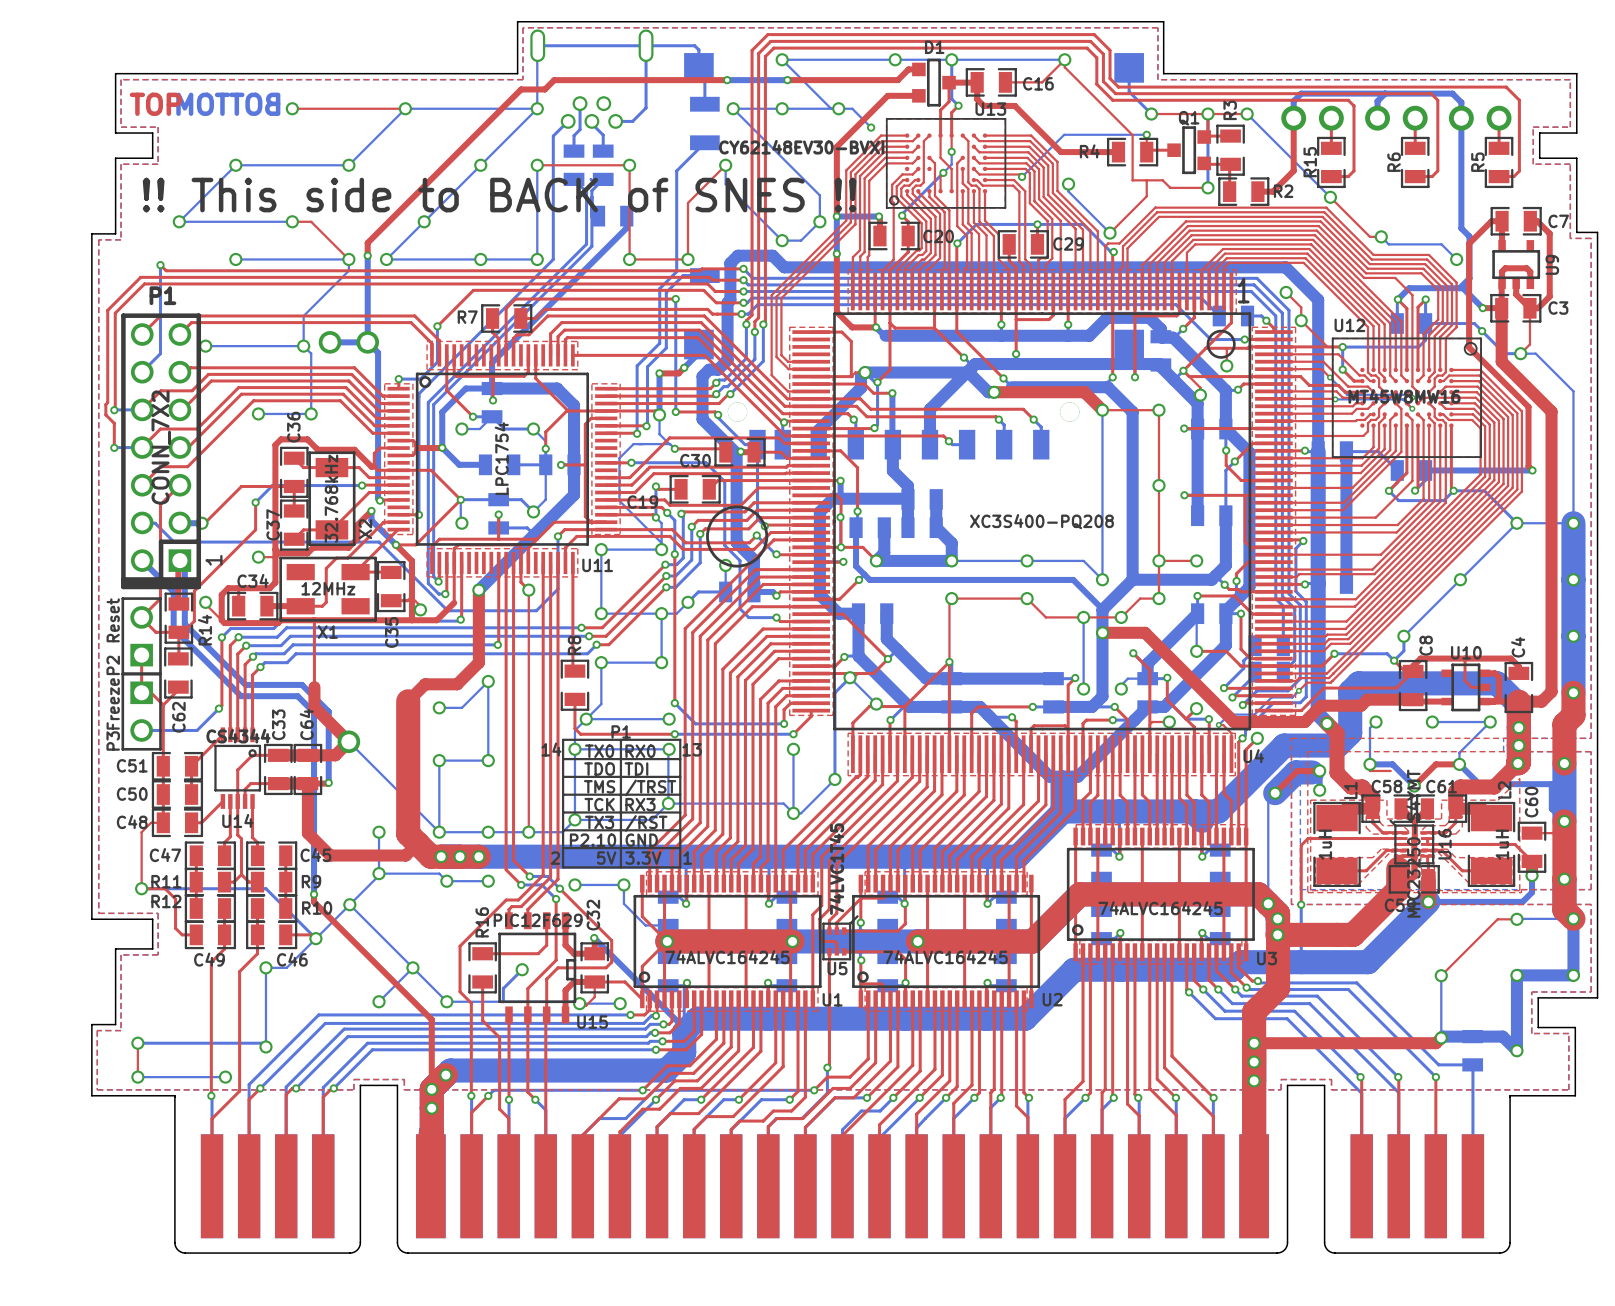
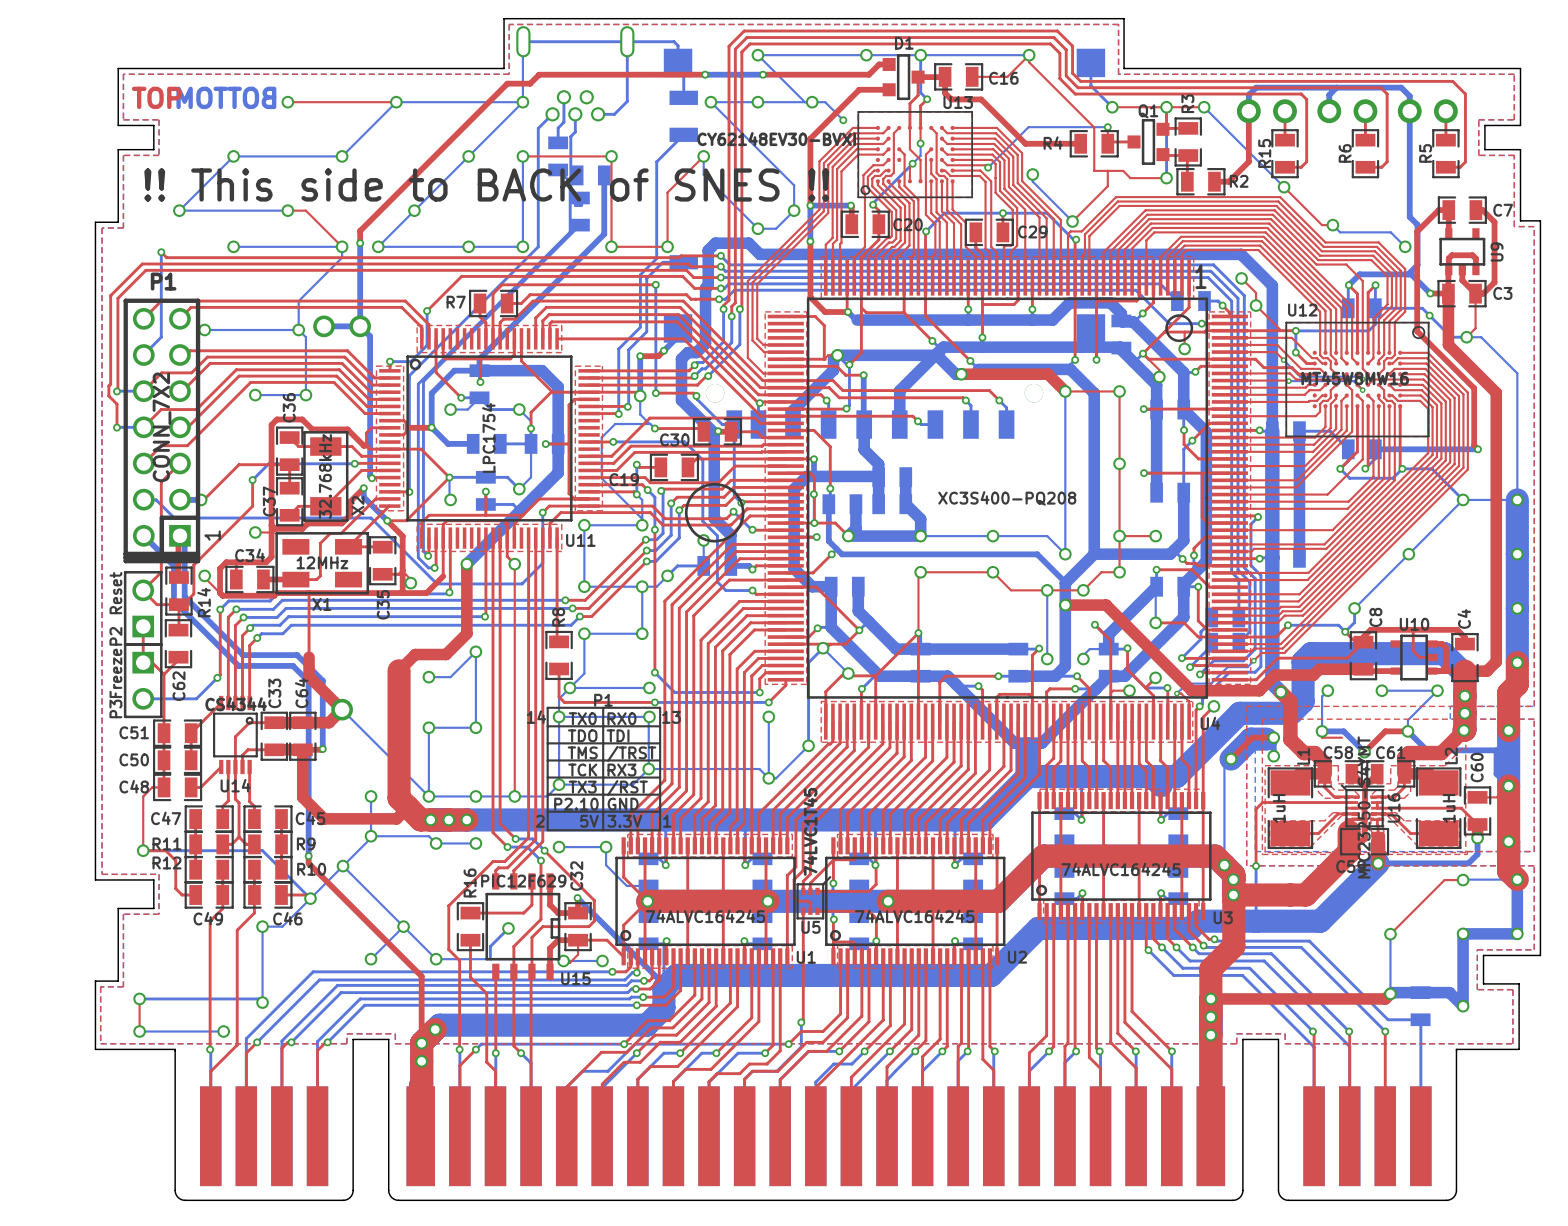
bottom track: (591, 123) (603, 135) (603, 151) -> (575, 116) (575, 132) (570, 136) (570, 188) (579, 198)
part: (603, 165) -> none
bottom track: (603, 179) (591, 190) (591, 246) (433, 404) -> (579, 225) (423, 381) (423, 386)
part: none -> (590, 175)
part: (612, 216) -> none
bottom track: (626, 216) (626, 228) (492, 362) (492, 376) -> (604, 175) (604, 234) (479, 358)
part: none -> (579, 211)

